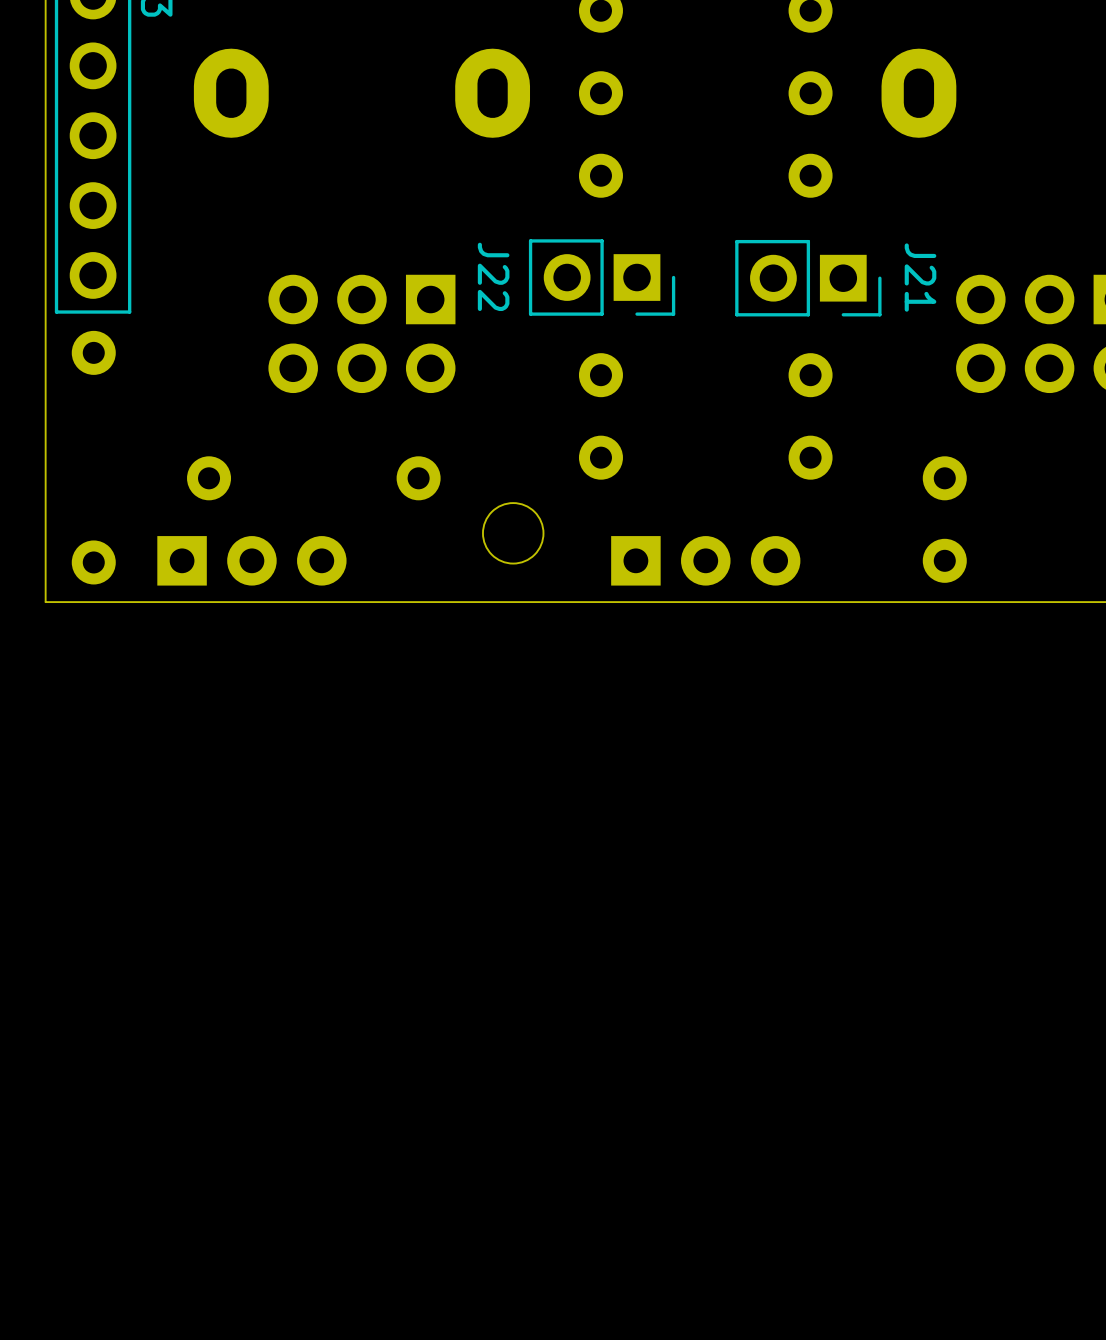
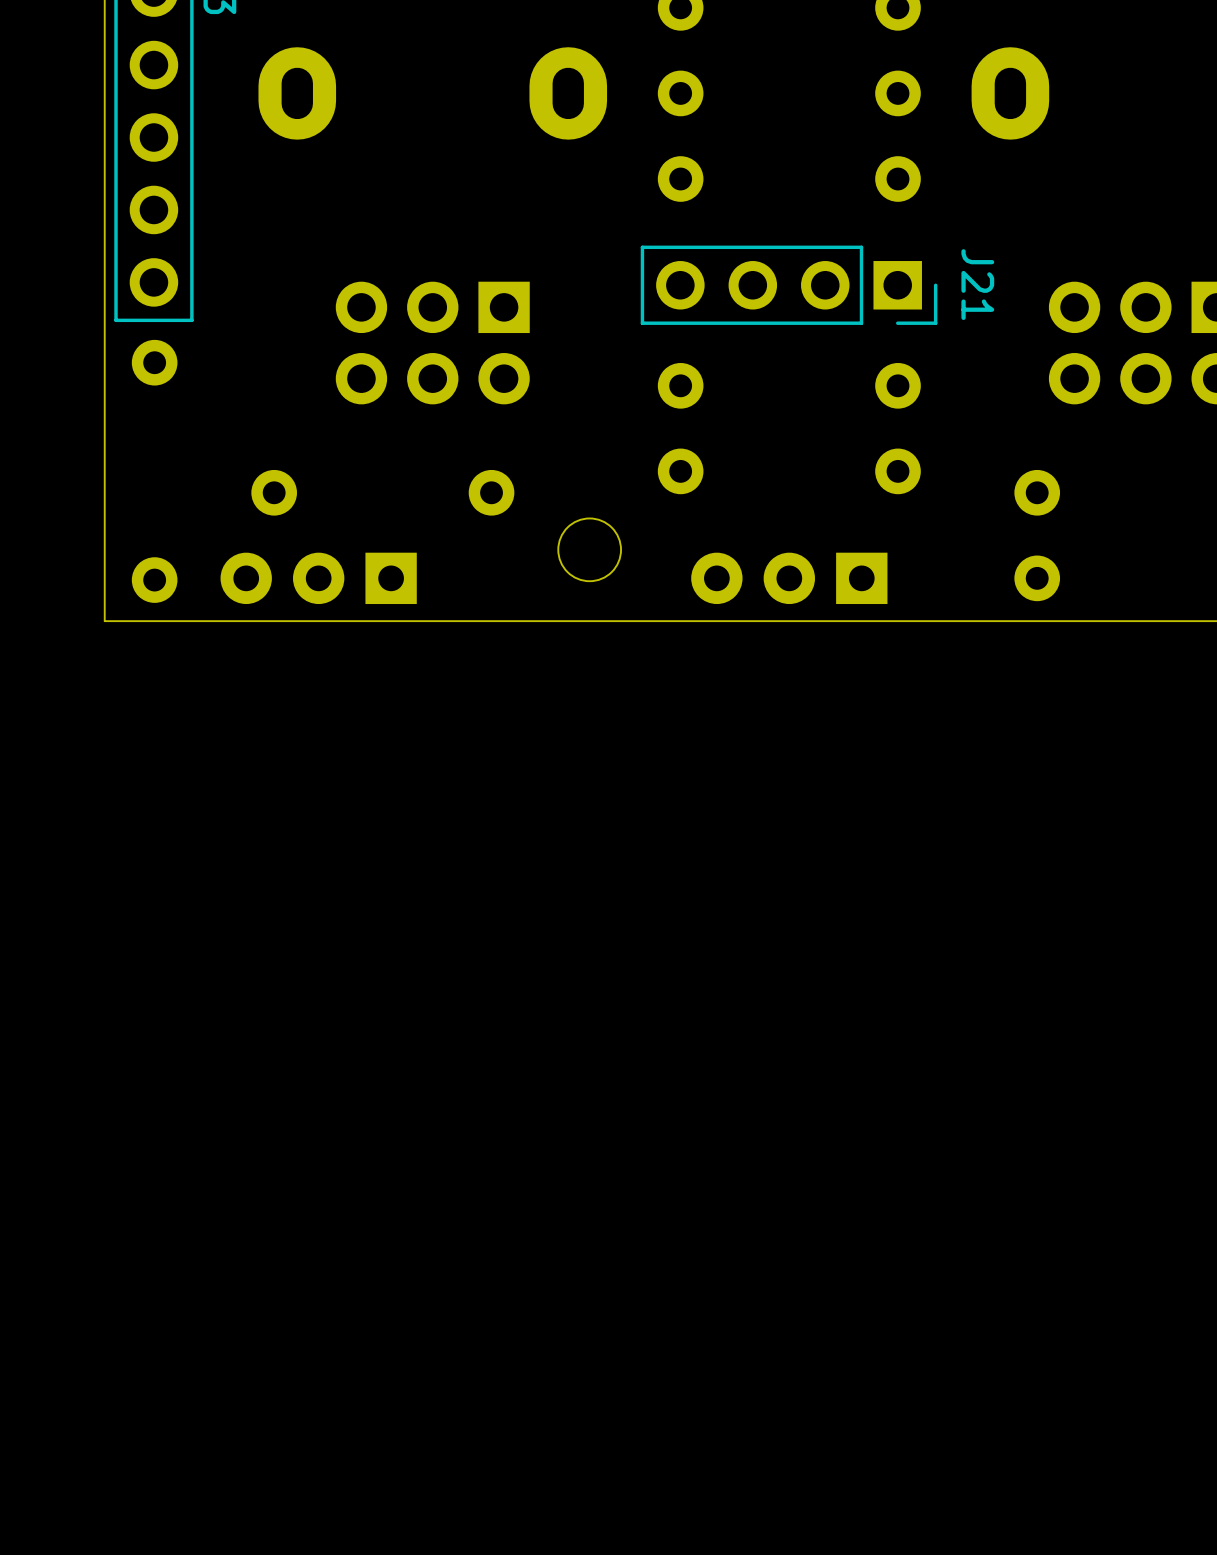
J21 footprint: [735, 239, 882, 317] -> [640, 245, 938, 325]
J22: (602, 277) -> none
J21 name position: J21 (920, 277) -> J21 (977, 284)
part rotation: 0° (251, 560) -> 180° (318, 578)
part rotation: 0° (705, 560) -> 180° (789, 578)

